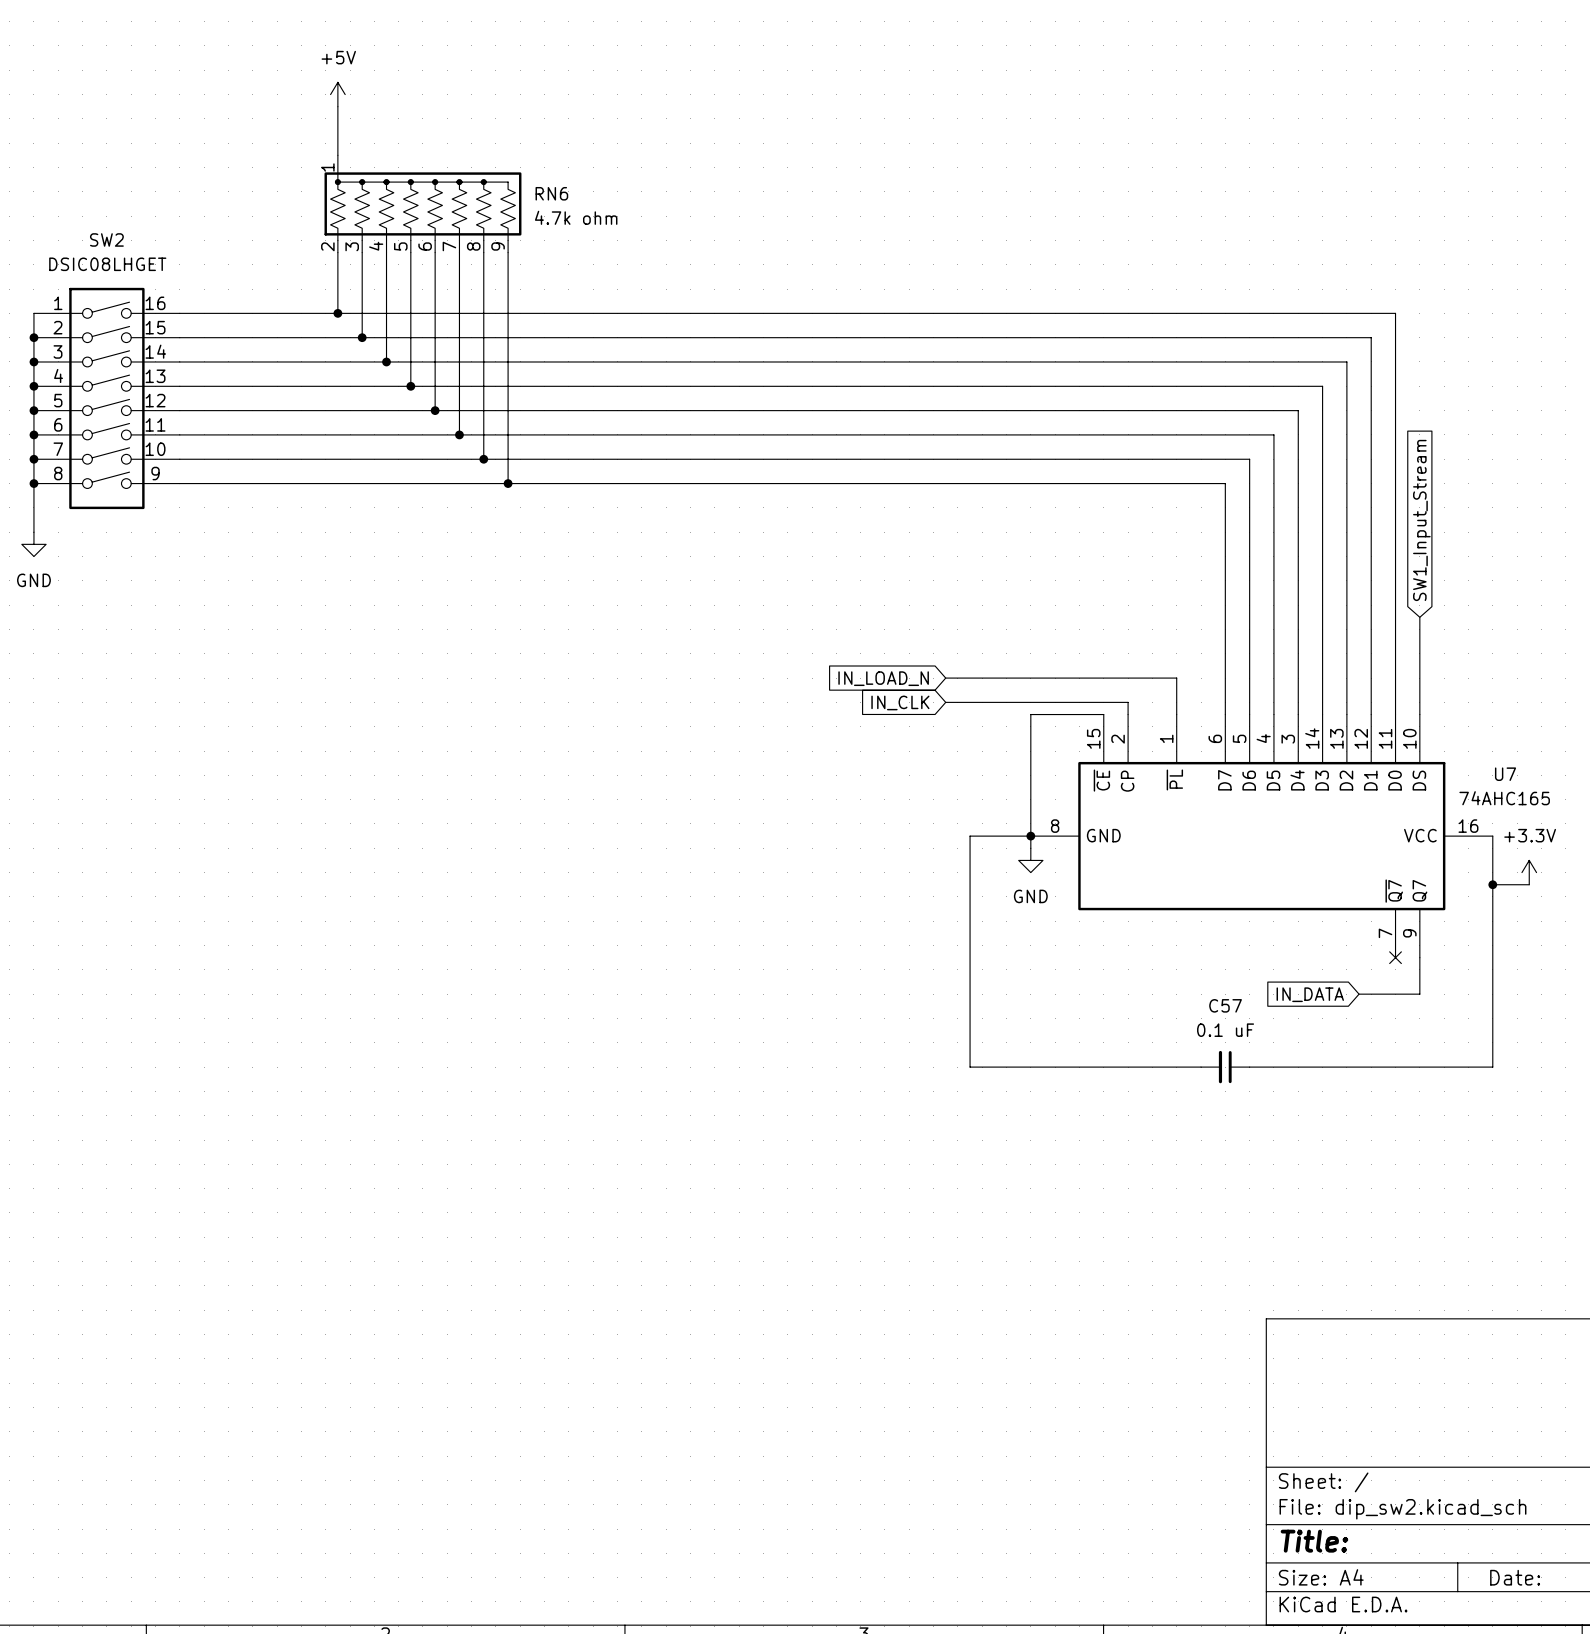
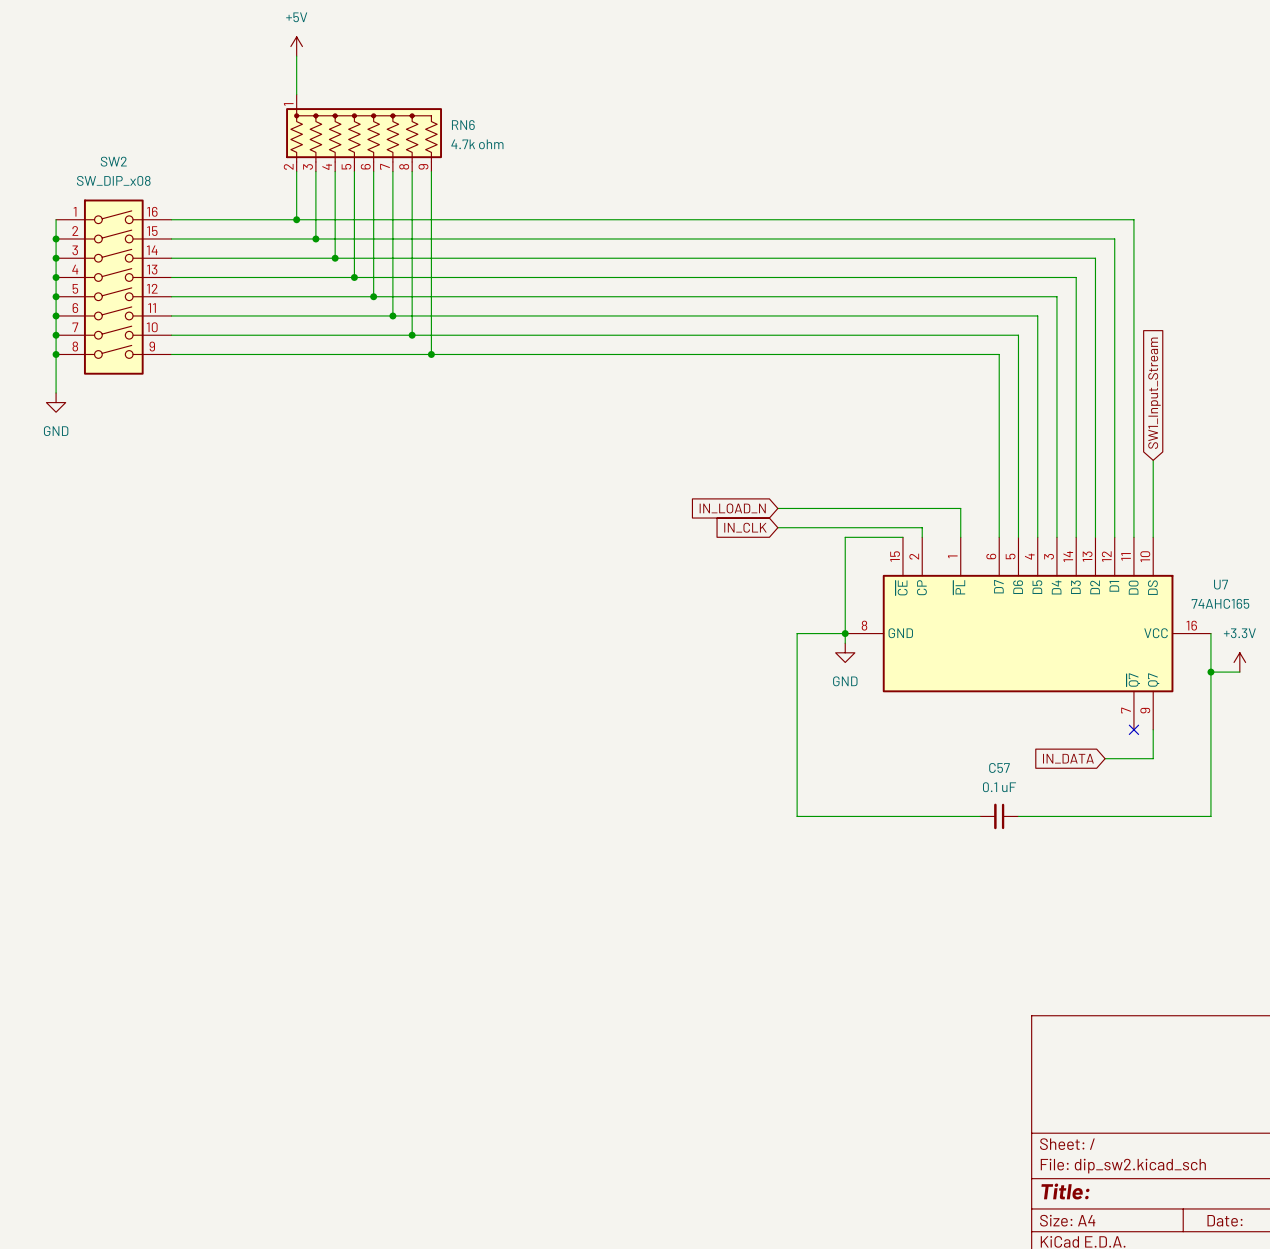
SW2 value: DSIC08LHGET (107, 264) -> SW_DIP_x08 (113, 180)

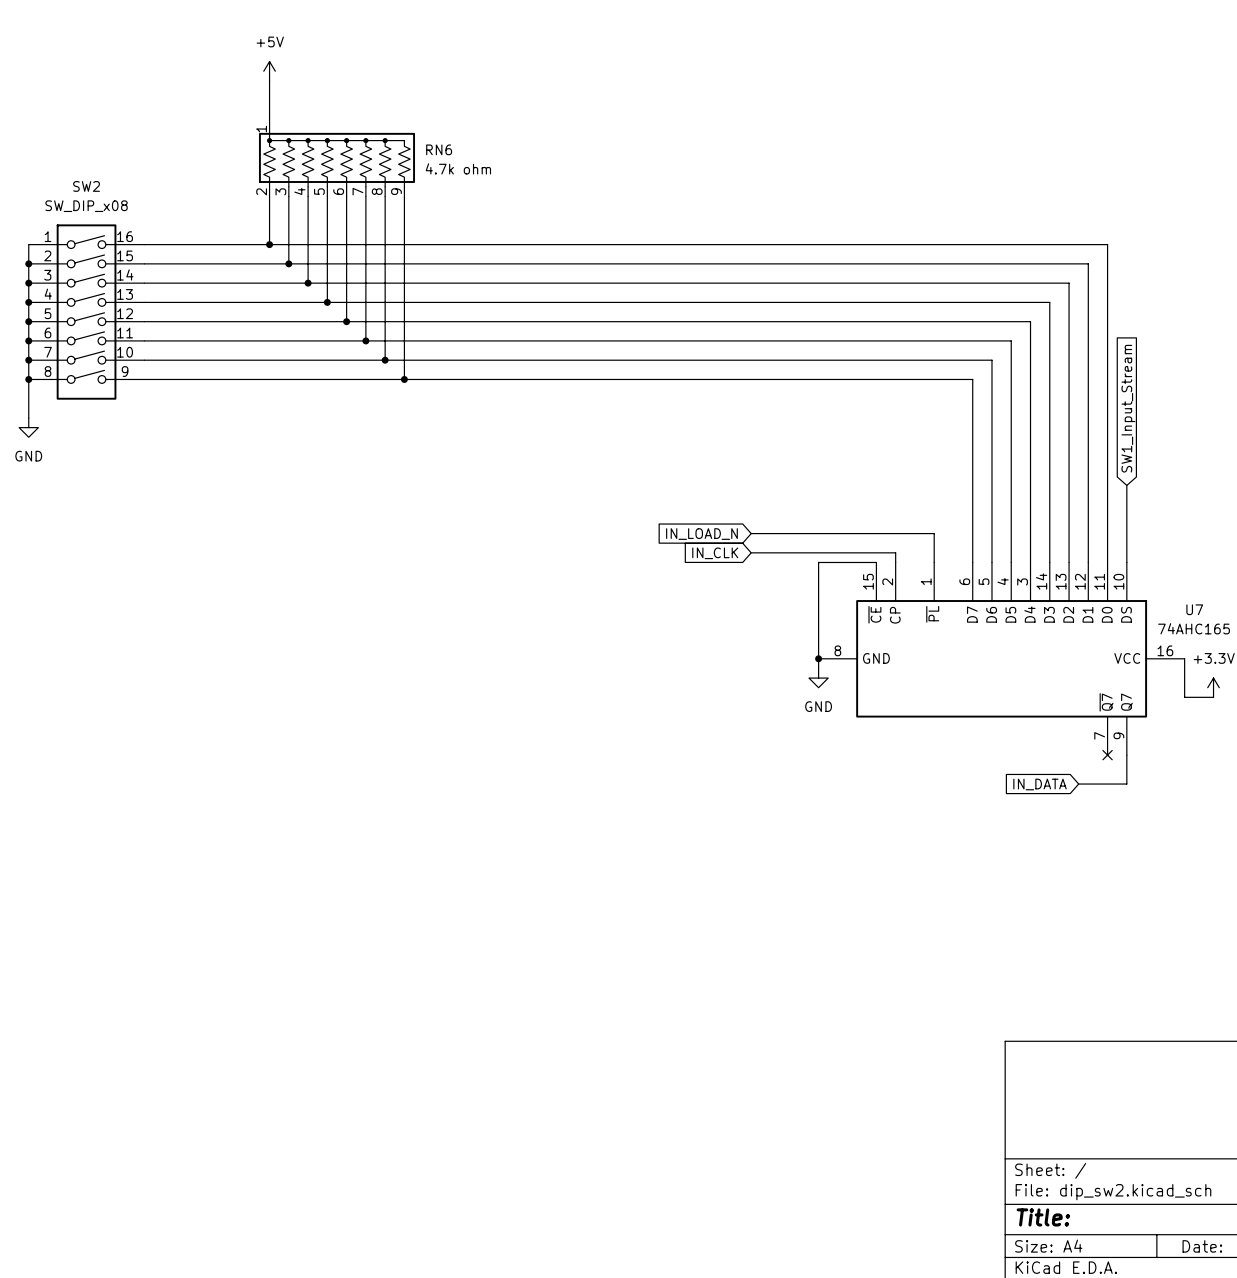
wire: (845, 633) (797, 633) (797, 816) (979, 816) -> none
wire: (1210, 672) (1210, 816) (1018, 816) -> none
junction: (1210, 672) -> none
C57: 0.1 uF (999, 816) -> none

